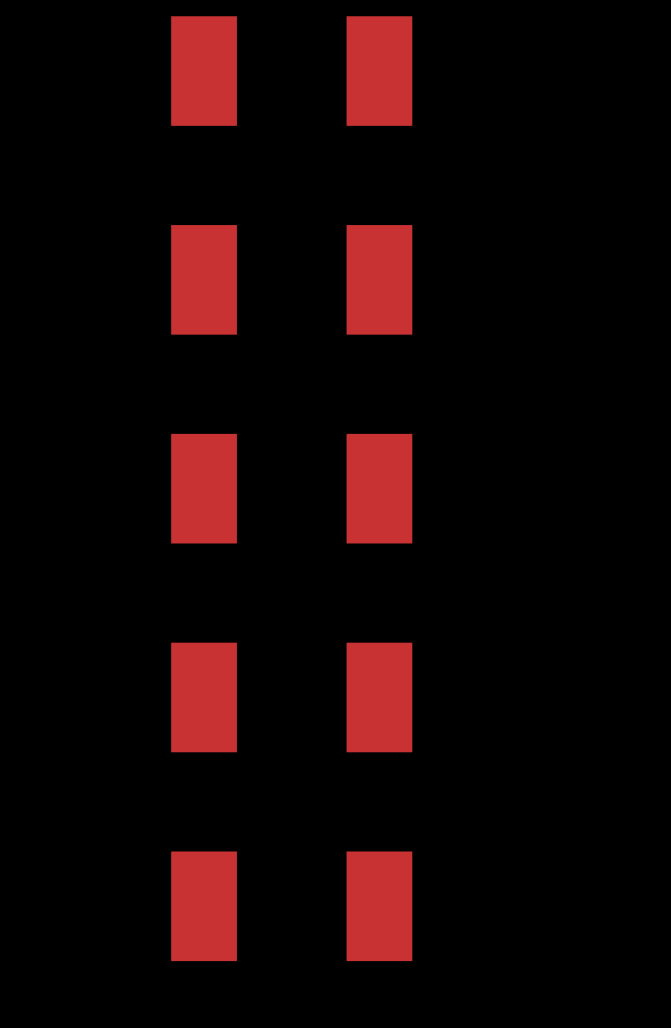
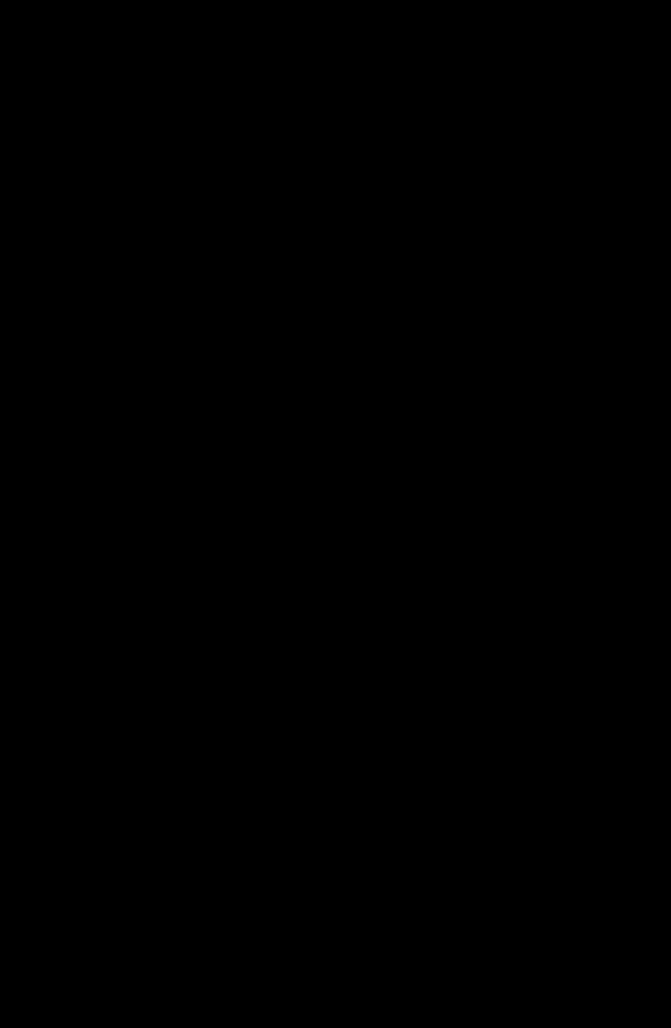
part: (291, 71) -> none
part: (291, 279) -> none
part: (291, 488) -> none
part: (291, 697) -> none
part: (291, 906) -> none

